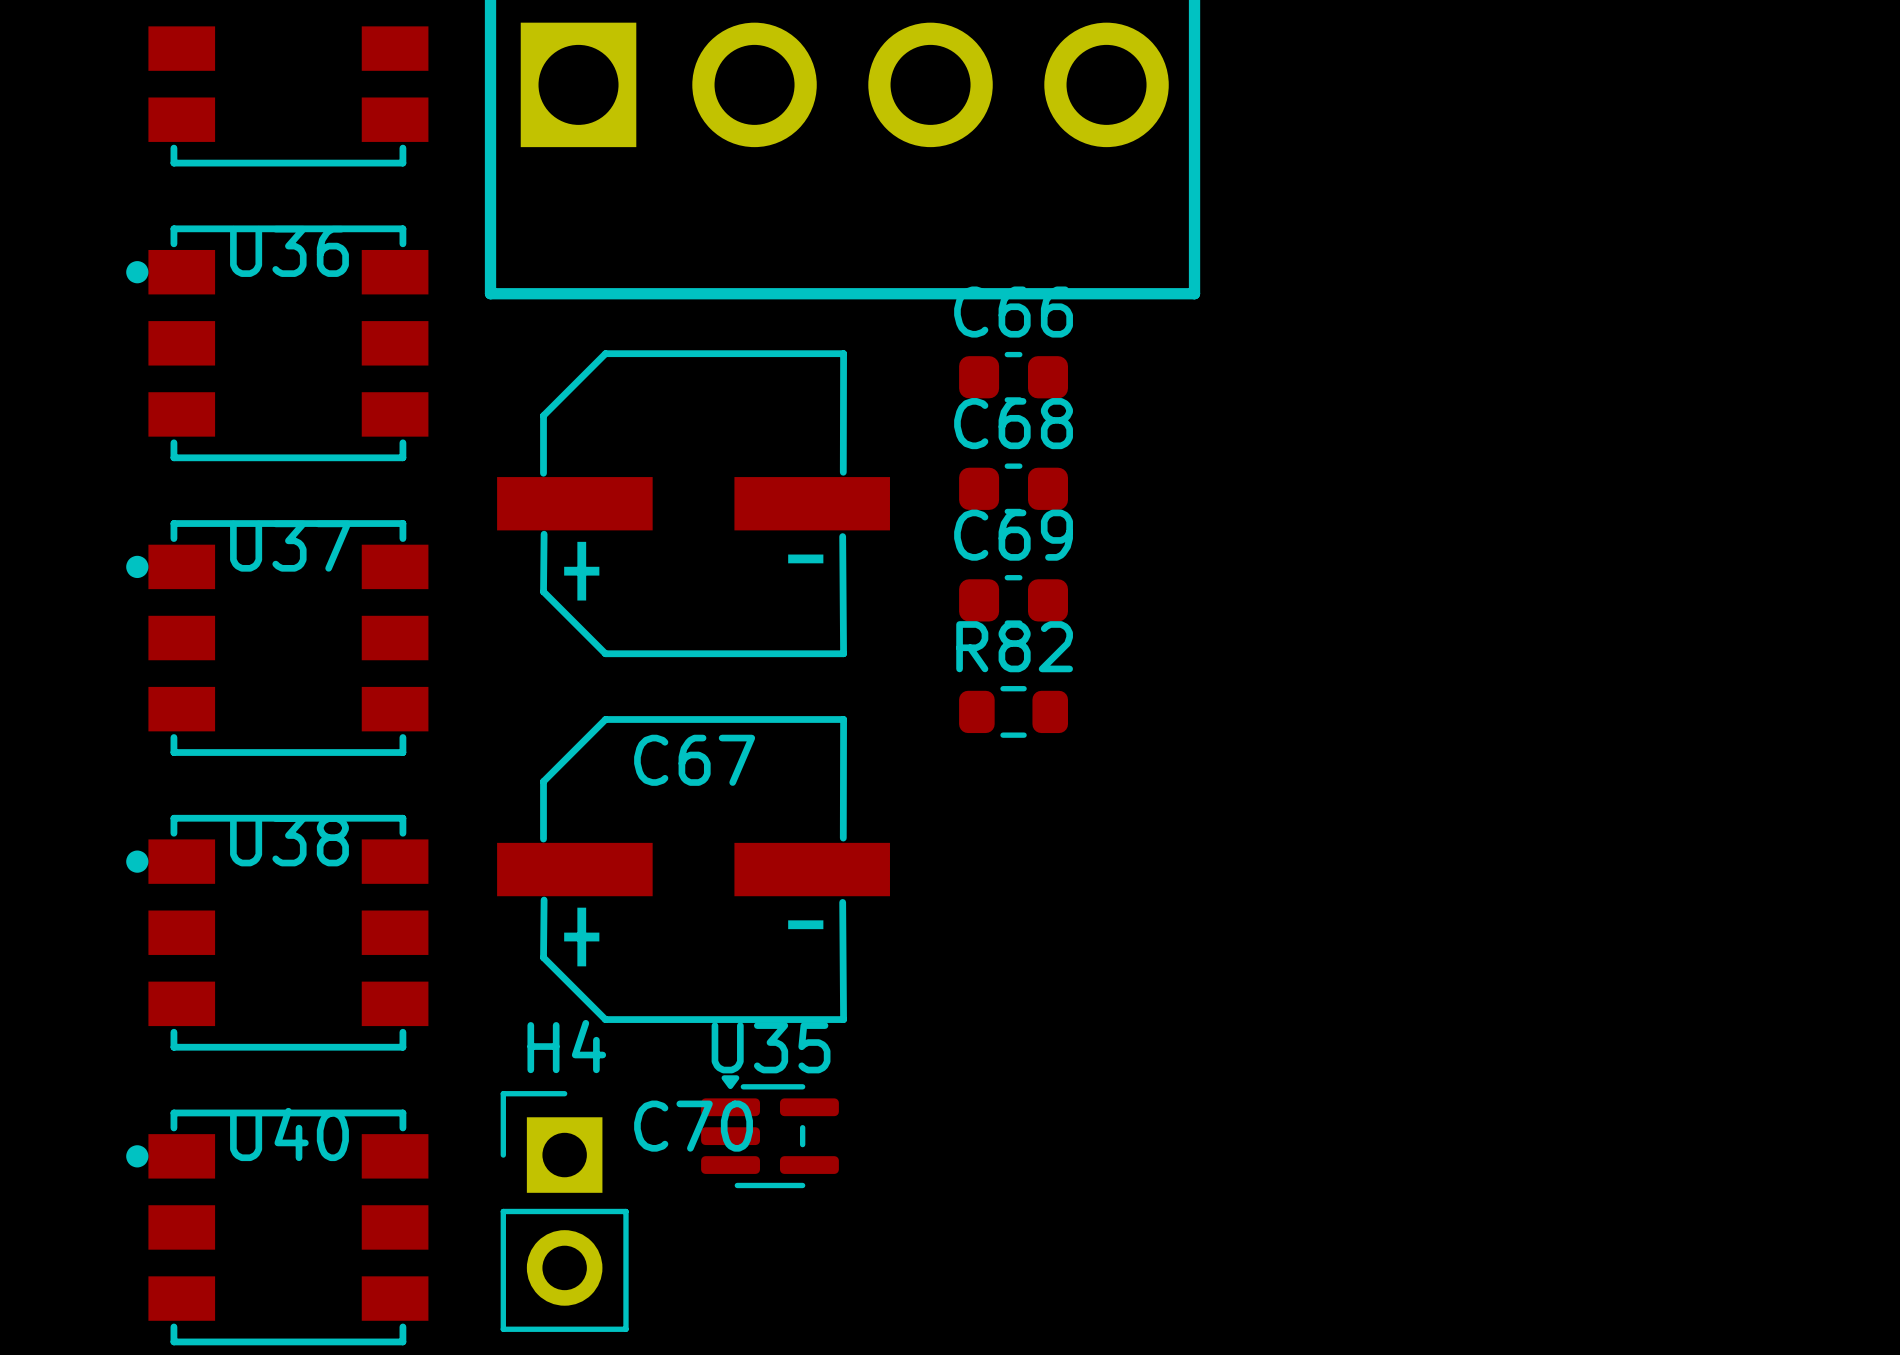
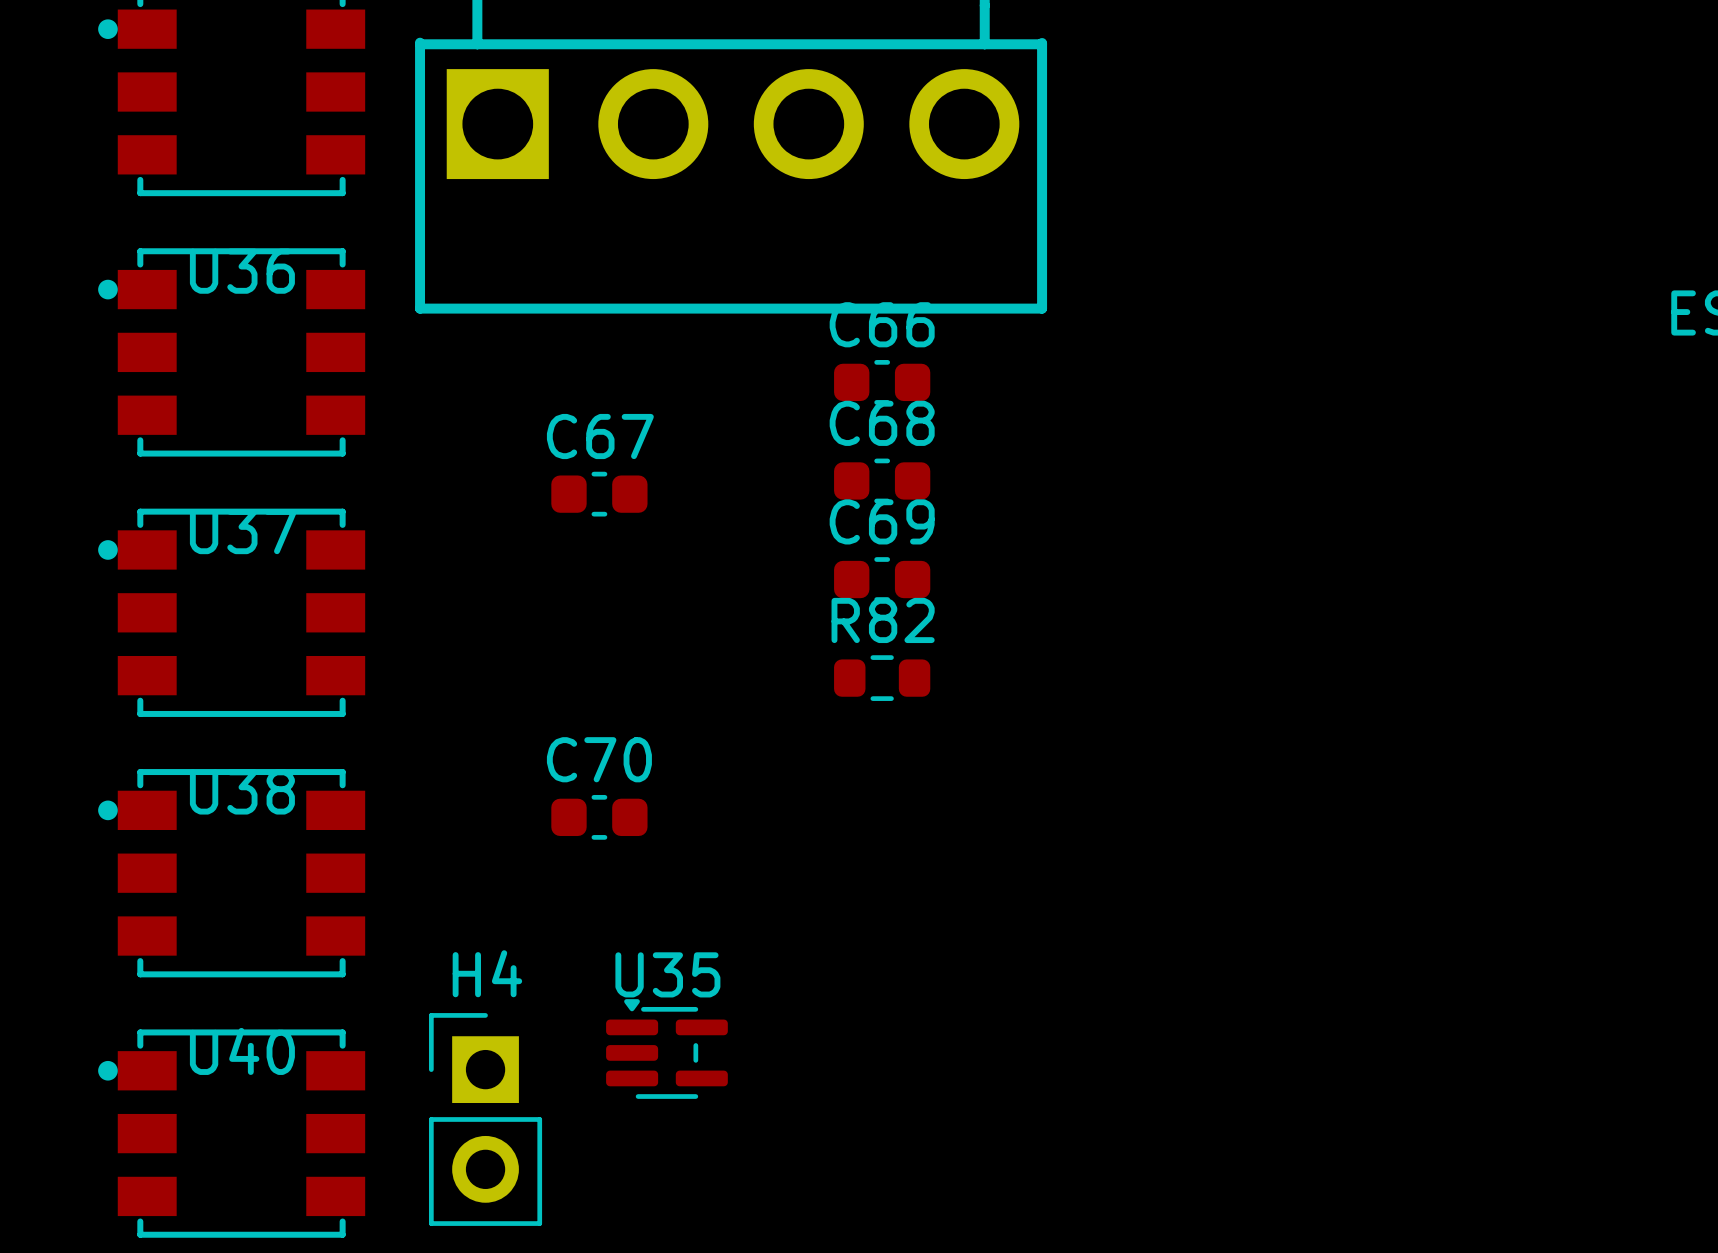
C67 footprint: [497, 350, 890, 658] -> [551, 471, 648, 517]
C70 footprint: [497, 716, 890, 1023] -> [551, 794, 648, 840]
C67 name position: C67 (694, 760) -> C67 (600, 436)
C70 name position: C70 (693, 1126) -> C70 (599, 759)

